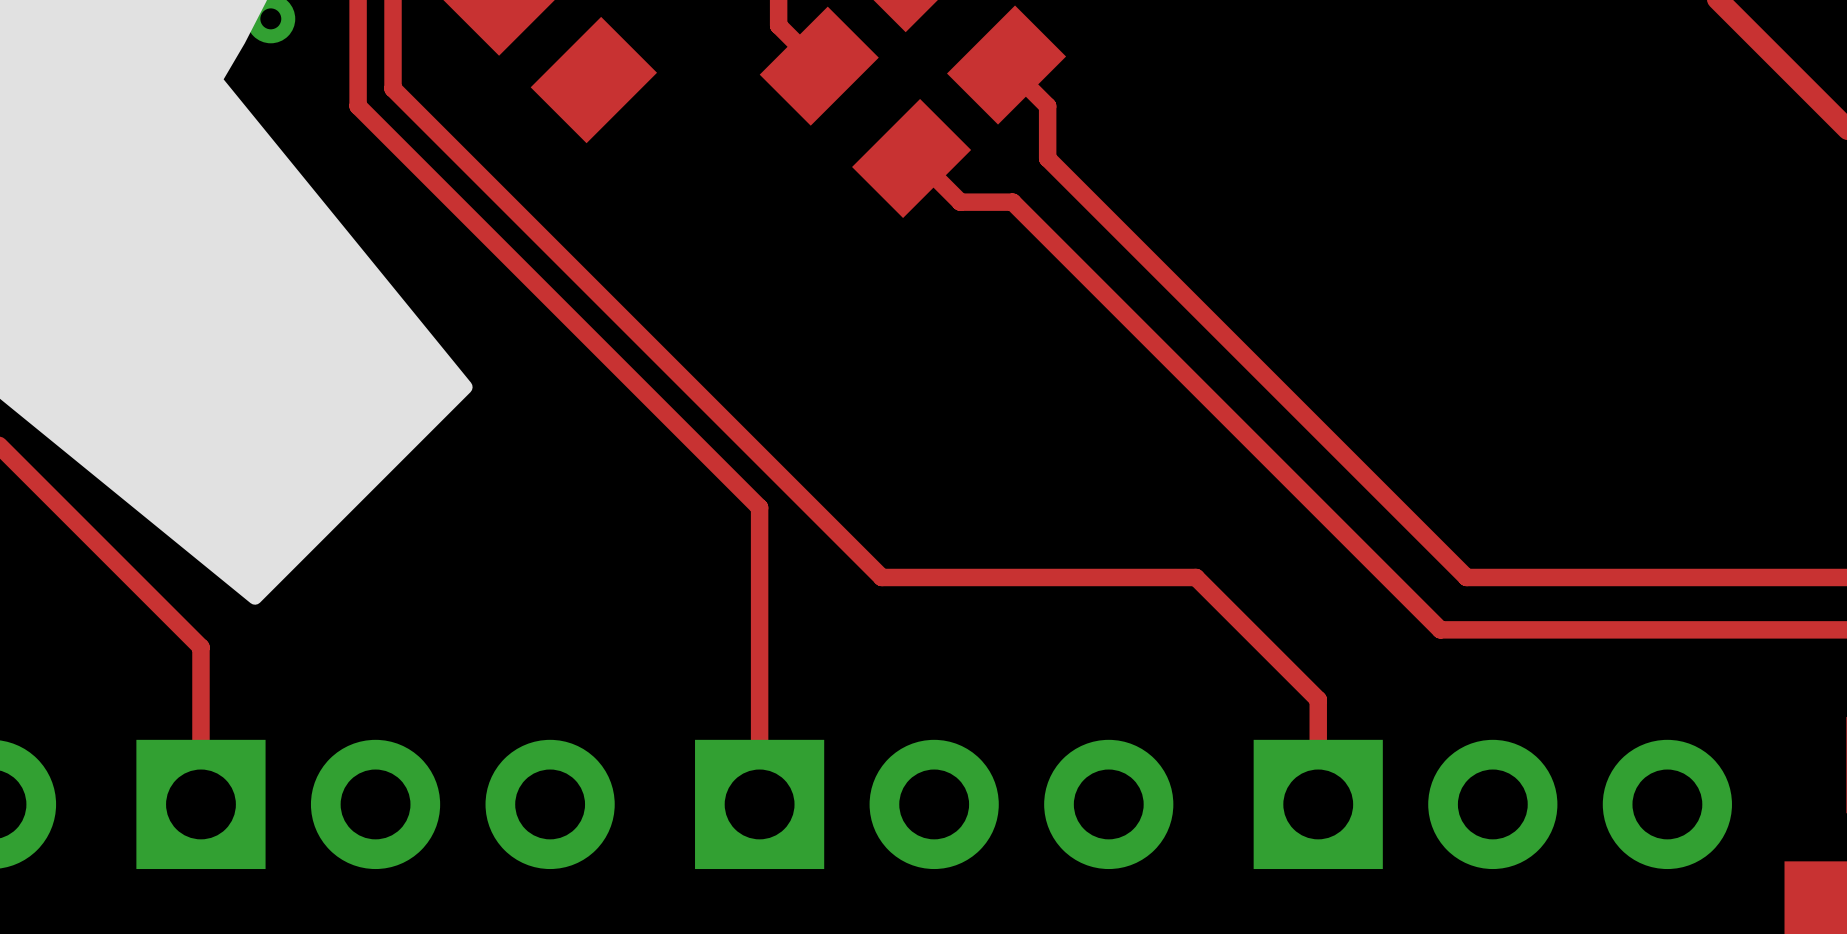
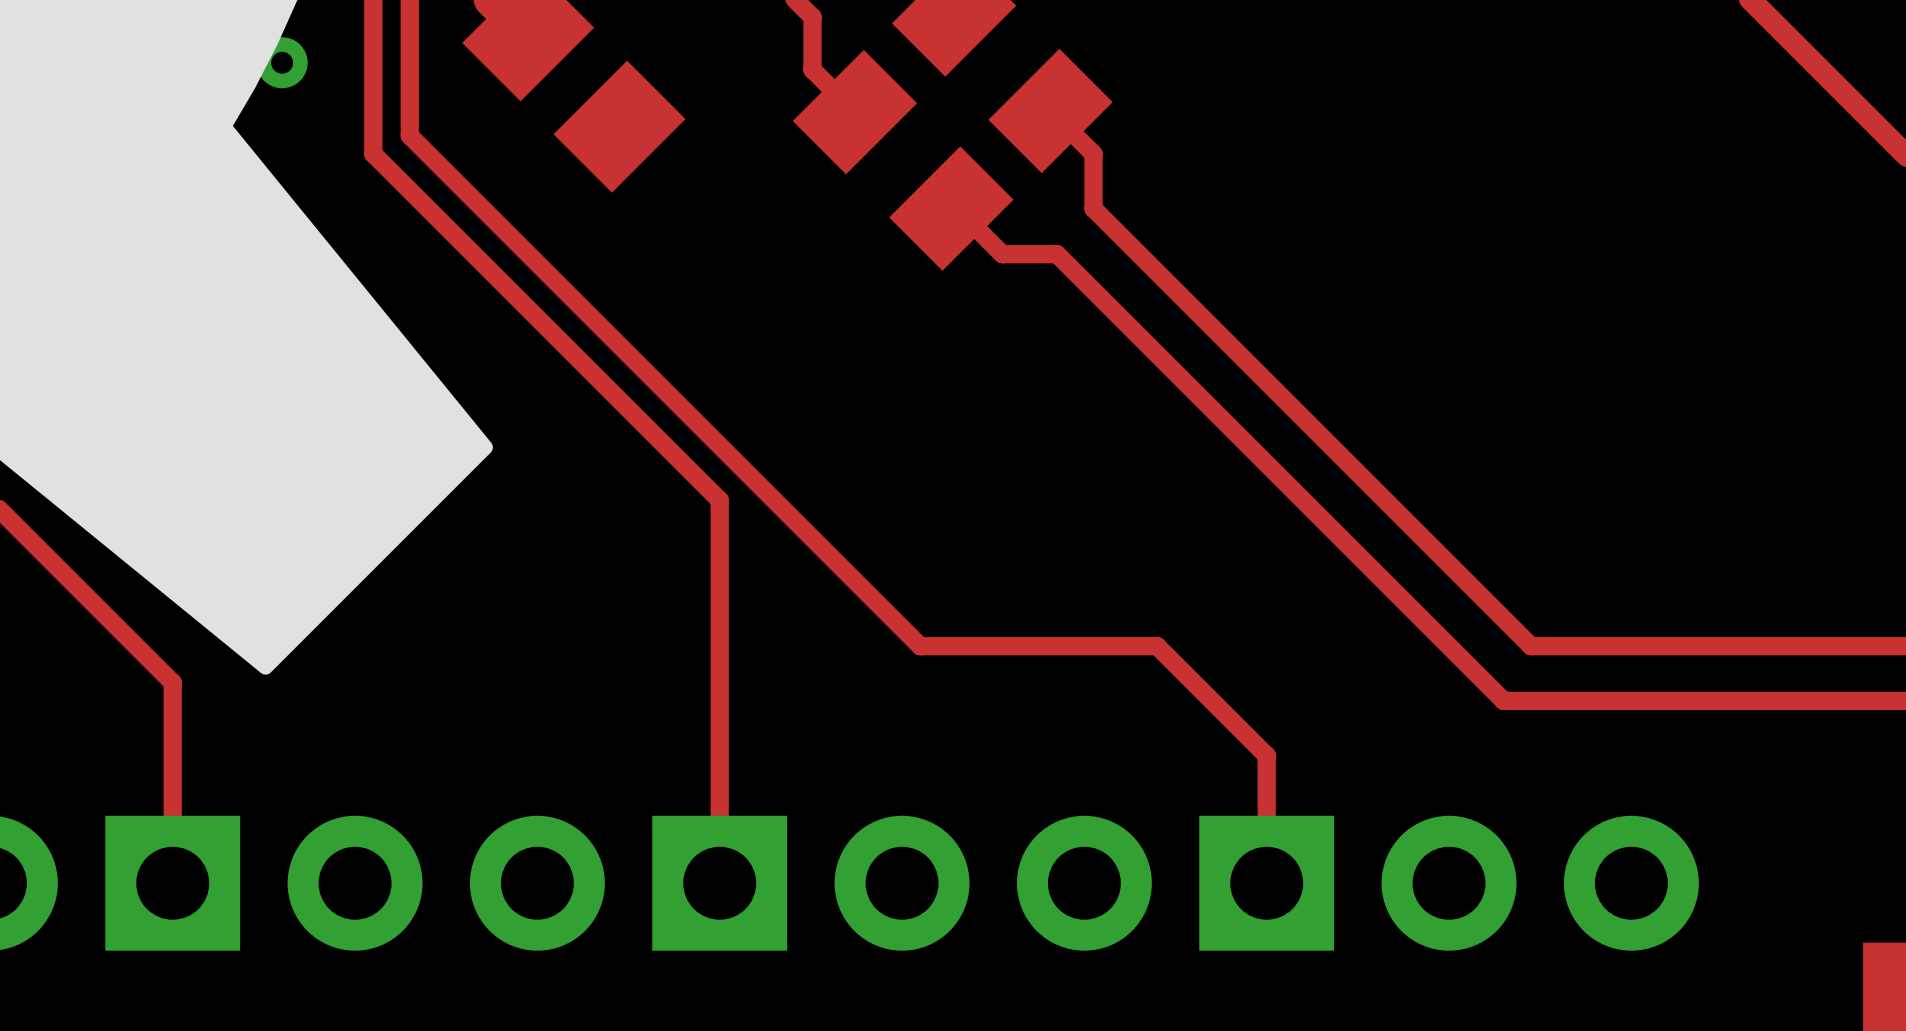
top track: (689, 437) (759, 507) (759, 804) -> (719, 500) (719, 883)
top track: (1108, 577) (1196, 577) (1318, 699) (1318, 804) -> (1157, 646) (1266, 755) (1266, 883)
top track: (166, 612) (200, 647) (200, 804) -> (172, 682) (172, 883)
part position: (375, 804) -> (355, 883)
part position: (934, 804) -> (902, 883)
part position: (1492, 804) -> (1449, 883)

